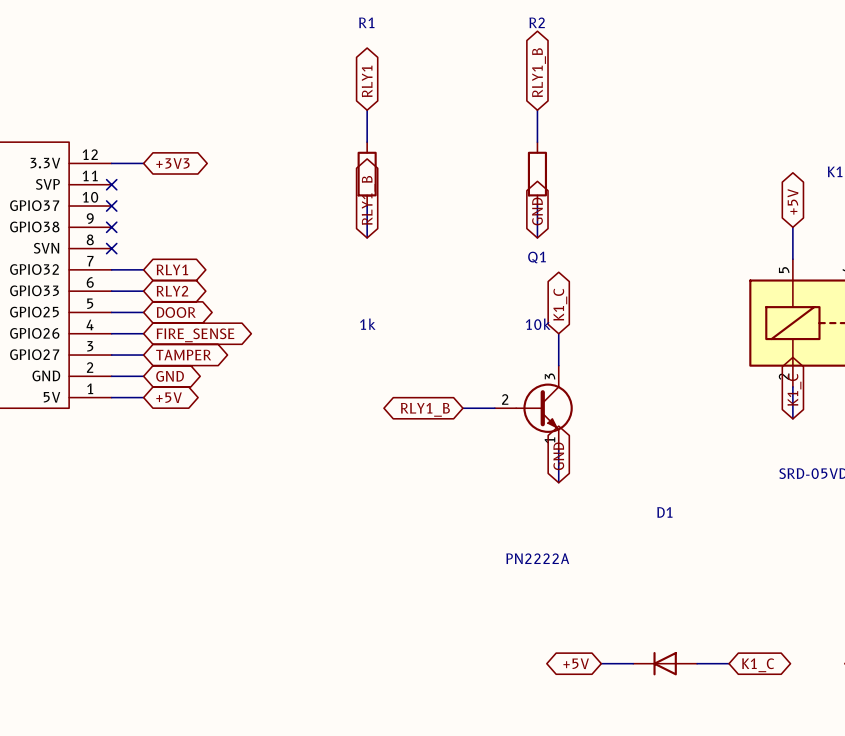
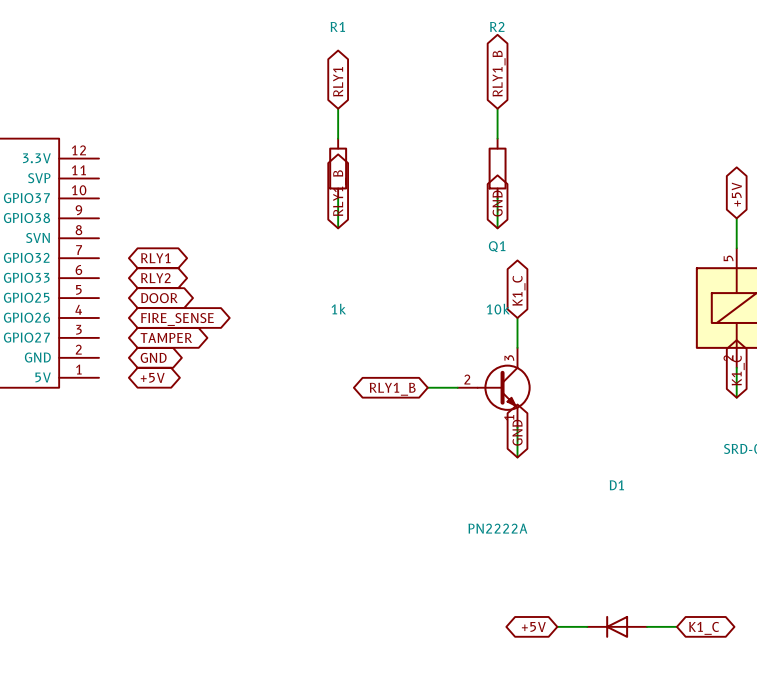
wire: (111, 163) (143, 163) -> none
global label: +3V3 (172, 163) -> none
no-connect mark: (111, 184) -> none
no-connect mark: (111, 206) -> none
no-connect mark: (111, 227) -> none
no-connect mark: (111, 248) -> none
wire: (111, 269) (143, 269) -> none
wire: (111, 291) (143, 291) -> none
wire: (111, 312) (143, 312) -> none
wire: (111, 333) (143, 333) -> none
wire: (111, 355) (143, 355) -> none
wire: (111, 376) (143, 376) -> none
wire: (111, 397) (143, 397) -> none

